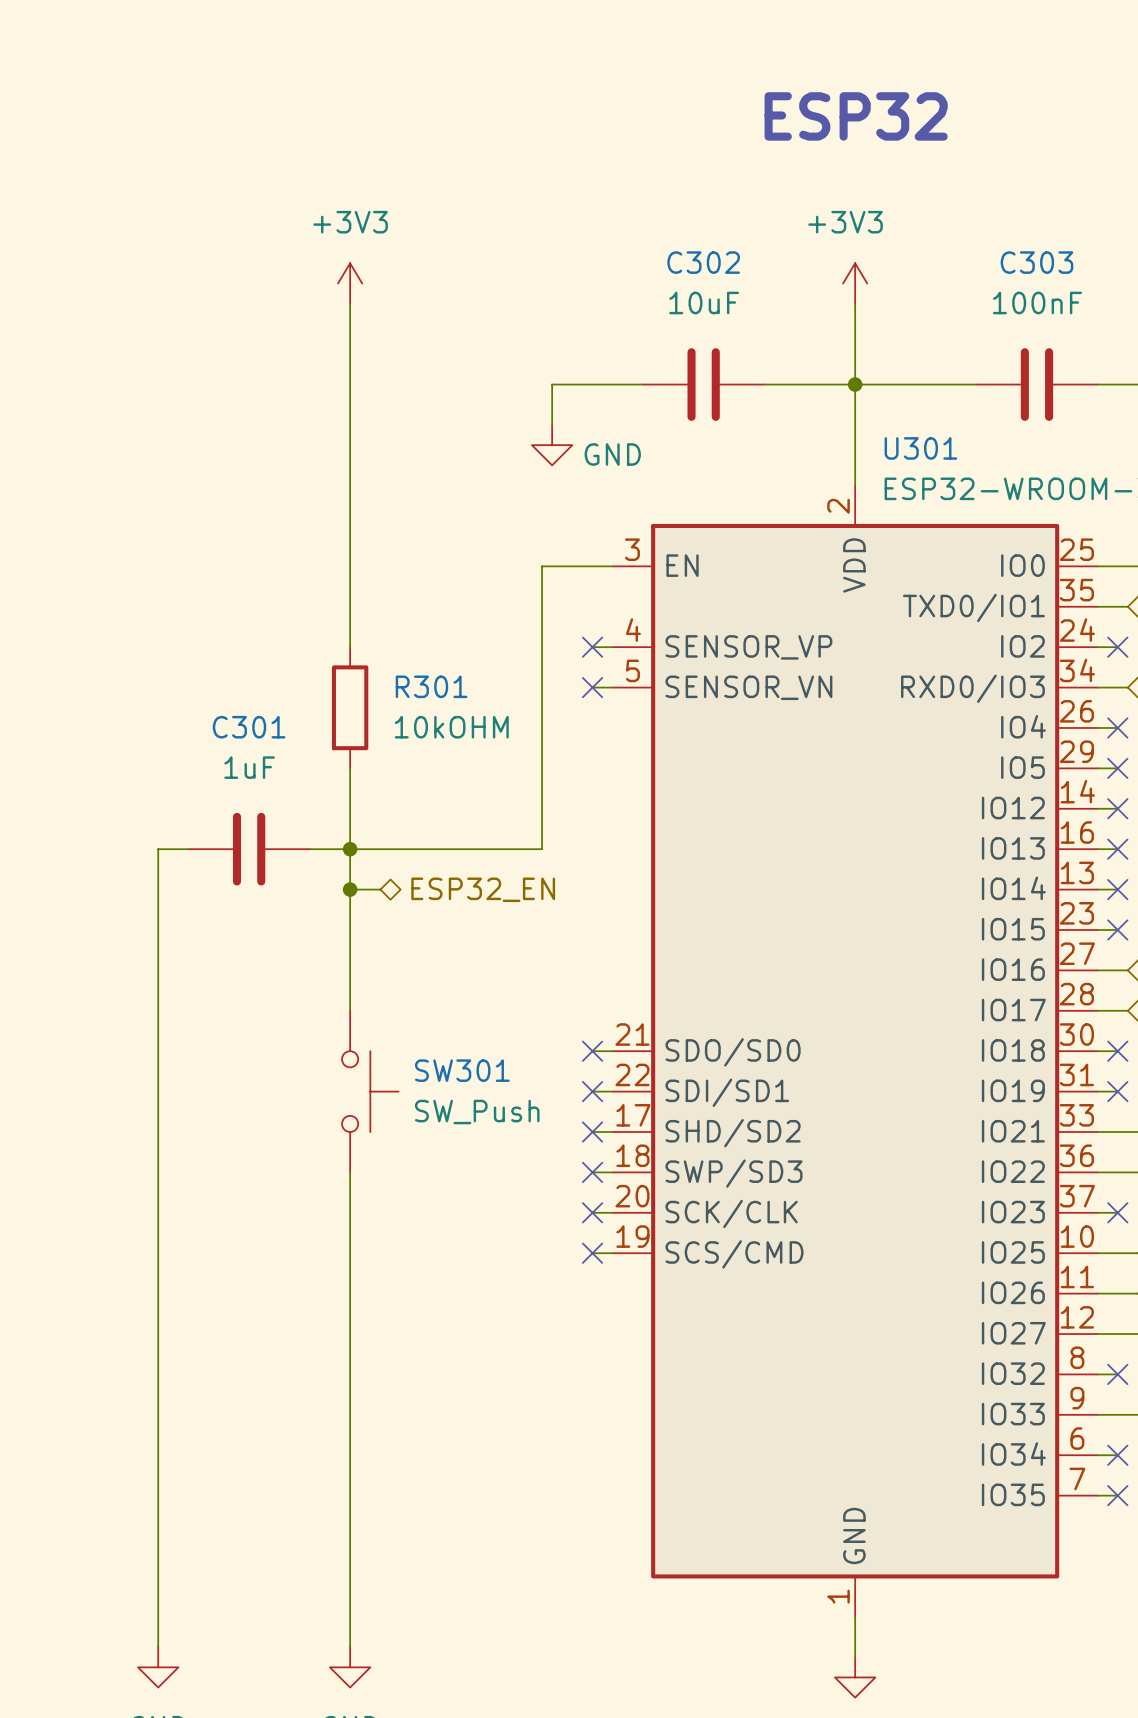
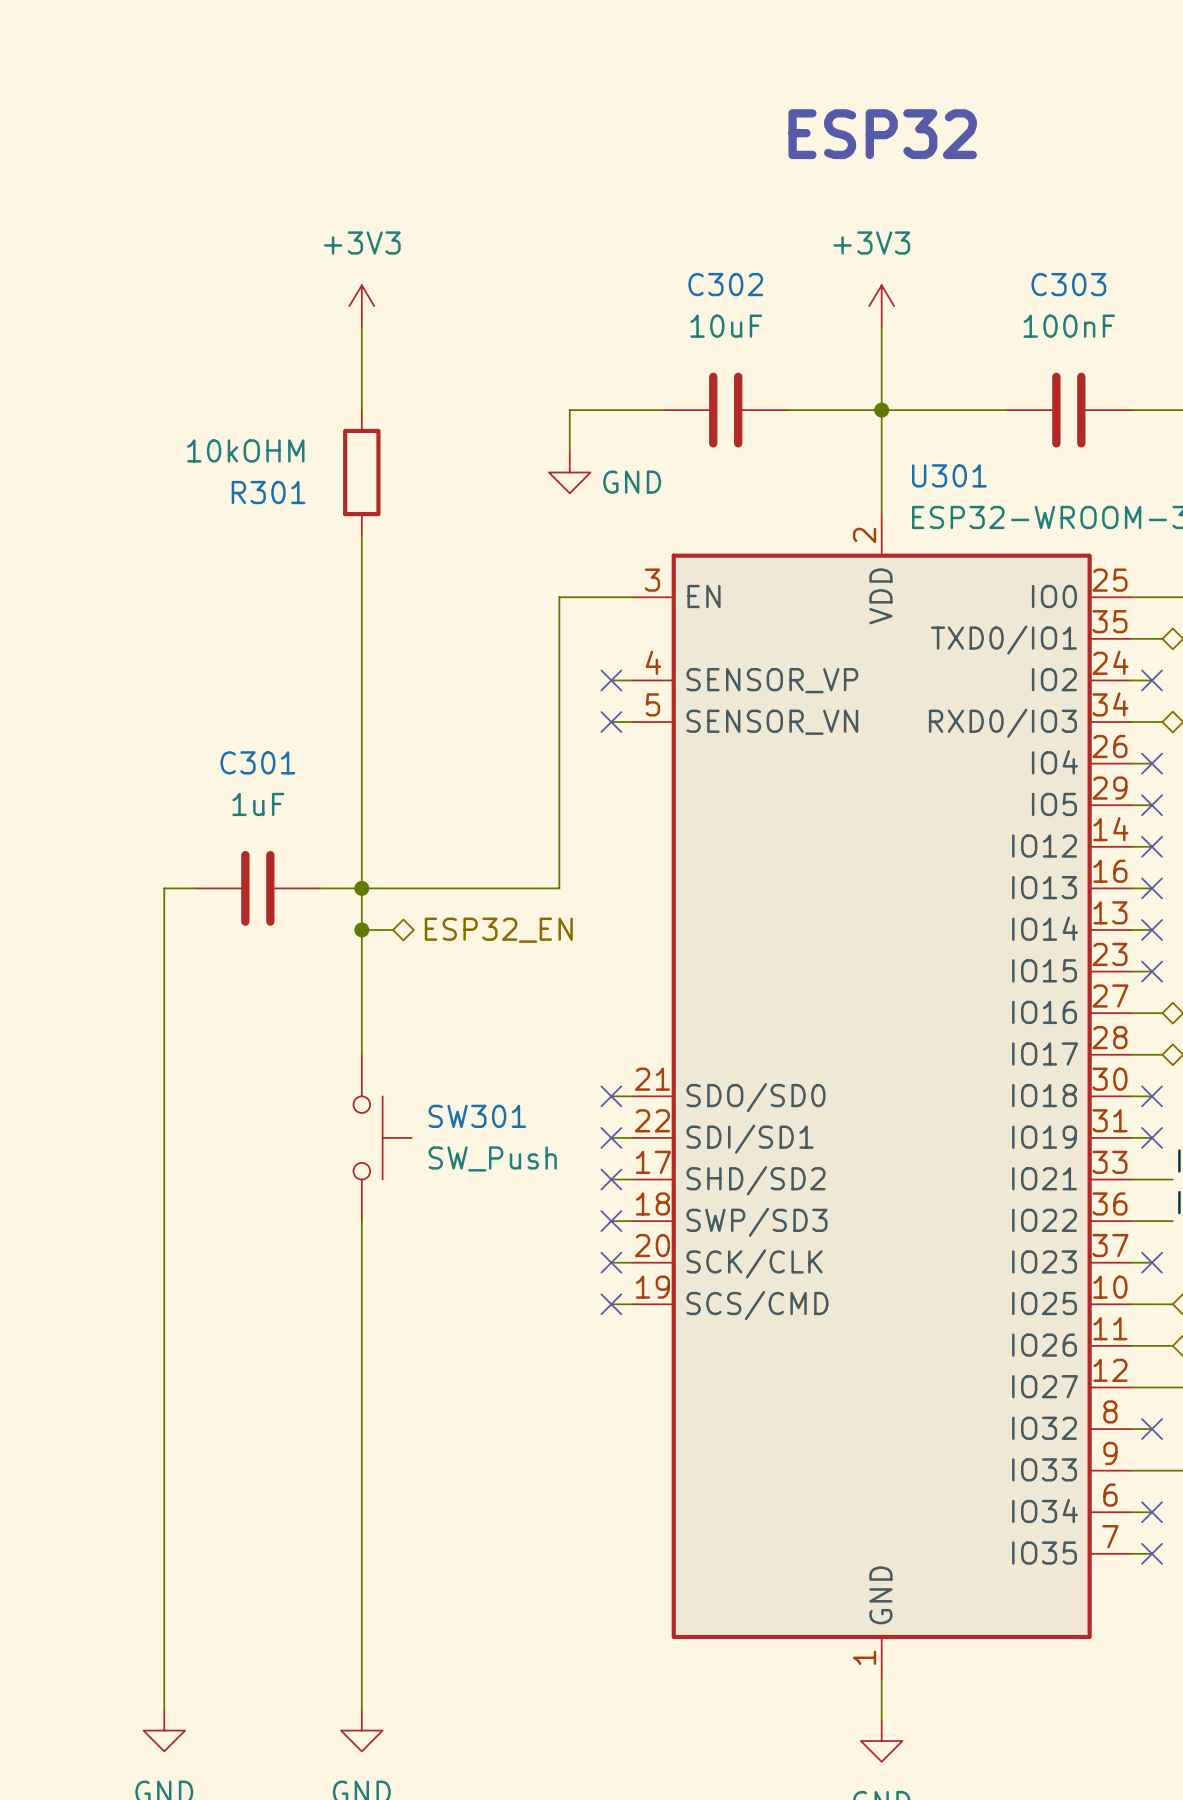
wire: (350, 384) (350, 505) -> (361, 680) (361, 805)
R301 name position: R301 (431, 686) -> R301 (268, 492)
R301 position: (350, 707) -> (361, 472)
R301 value position: 10kOHM (451, 727) -> 10kOHM (245, 450)

